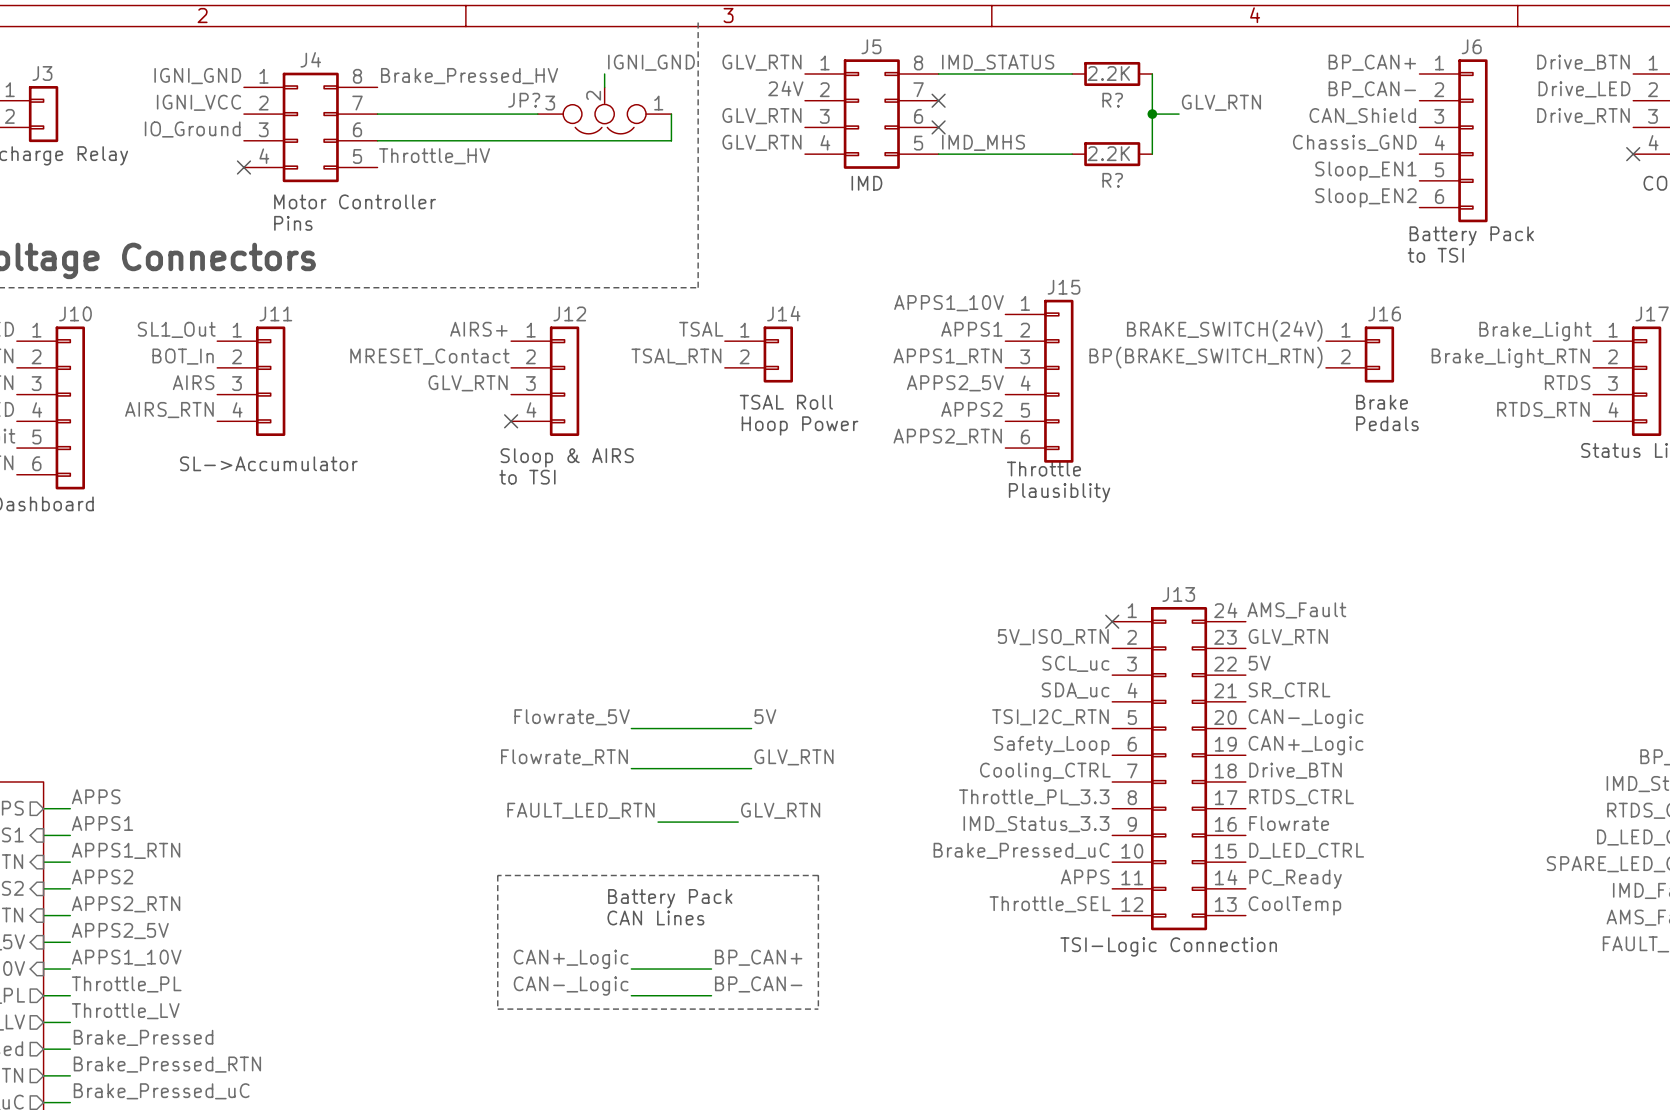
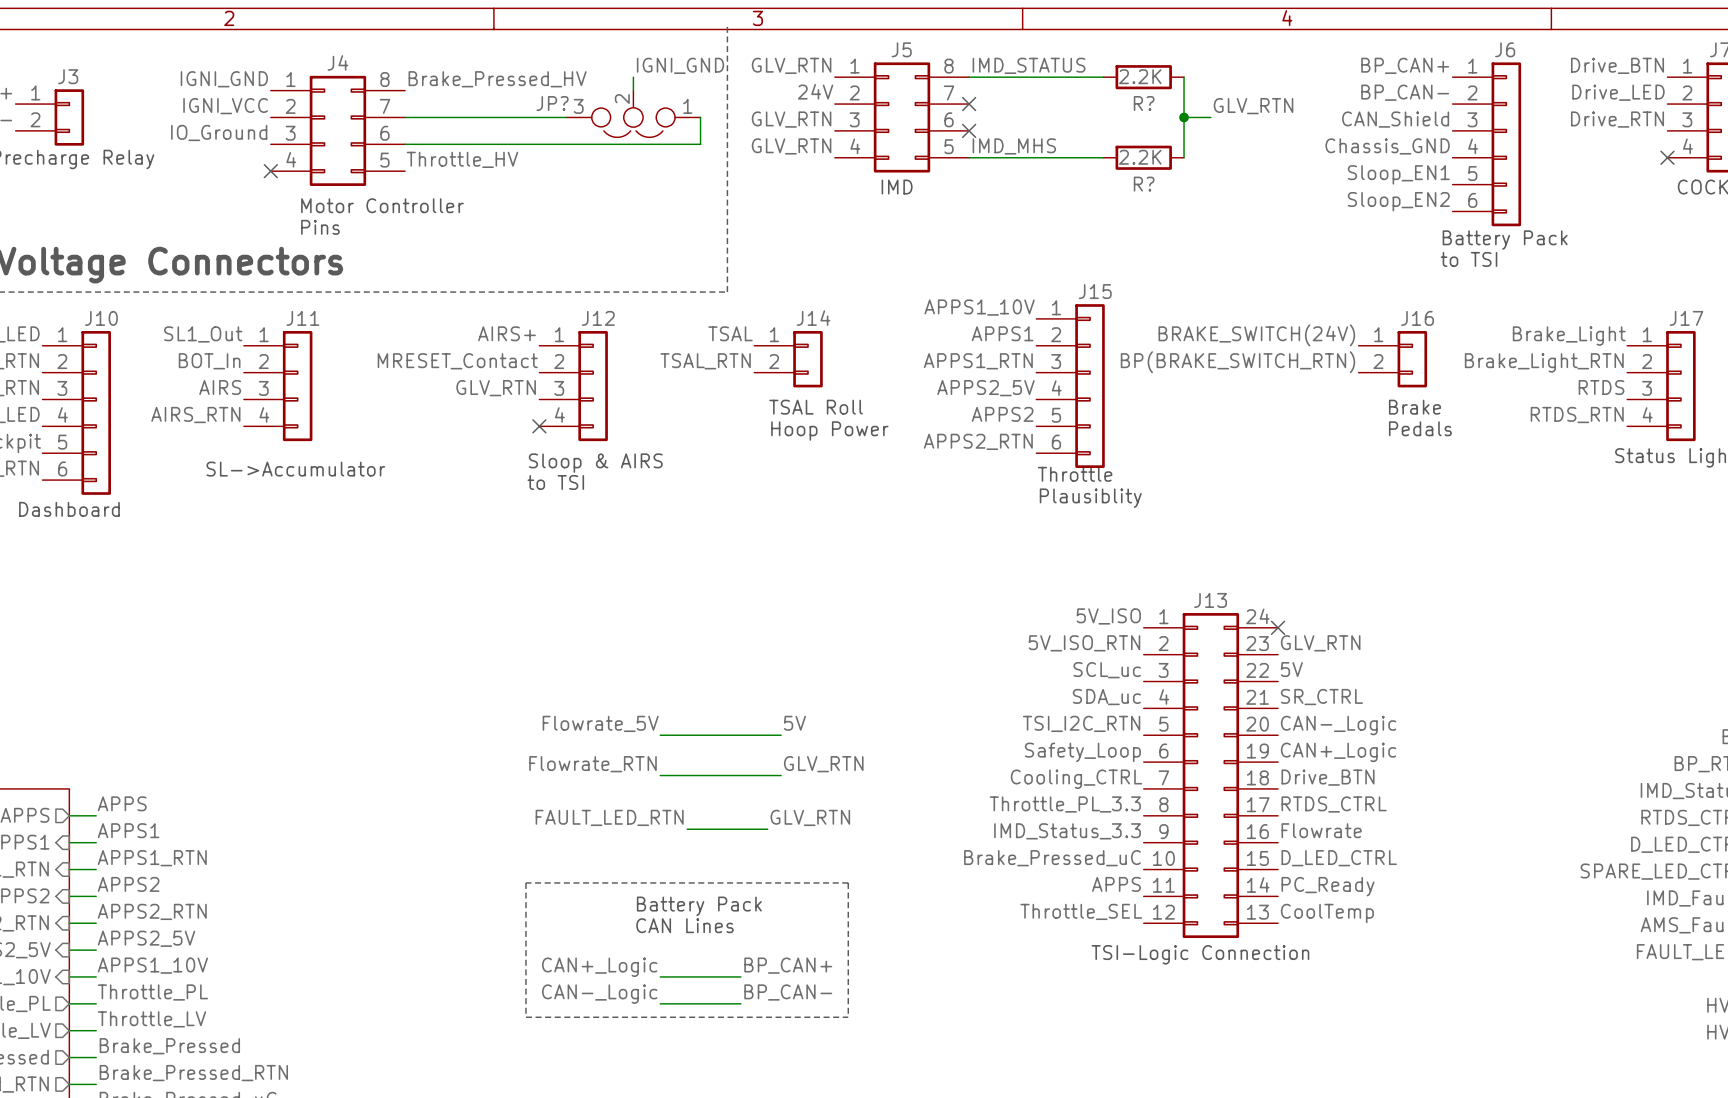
label: none -> 5V_ISO (1108, 616)
label: AMS_Fault (1296, 610) -> none
no-connect mark: (1112, 621) -> none
no-connect mark: none -> (1278, 627)

